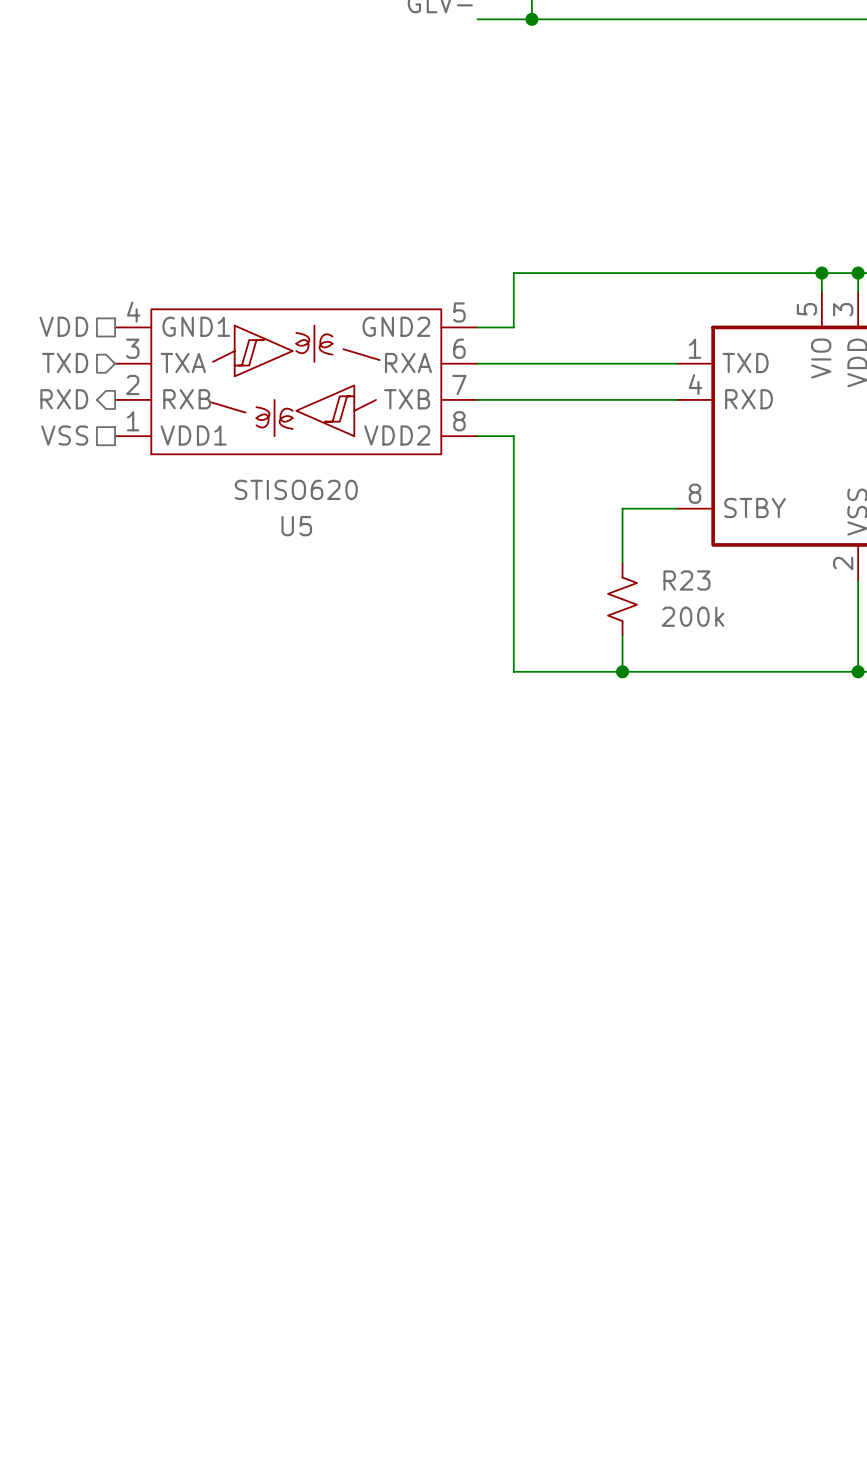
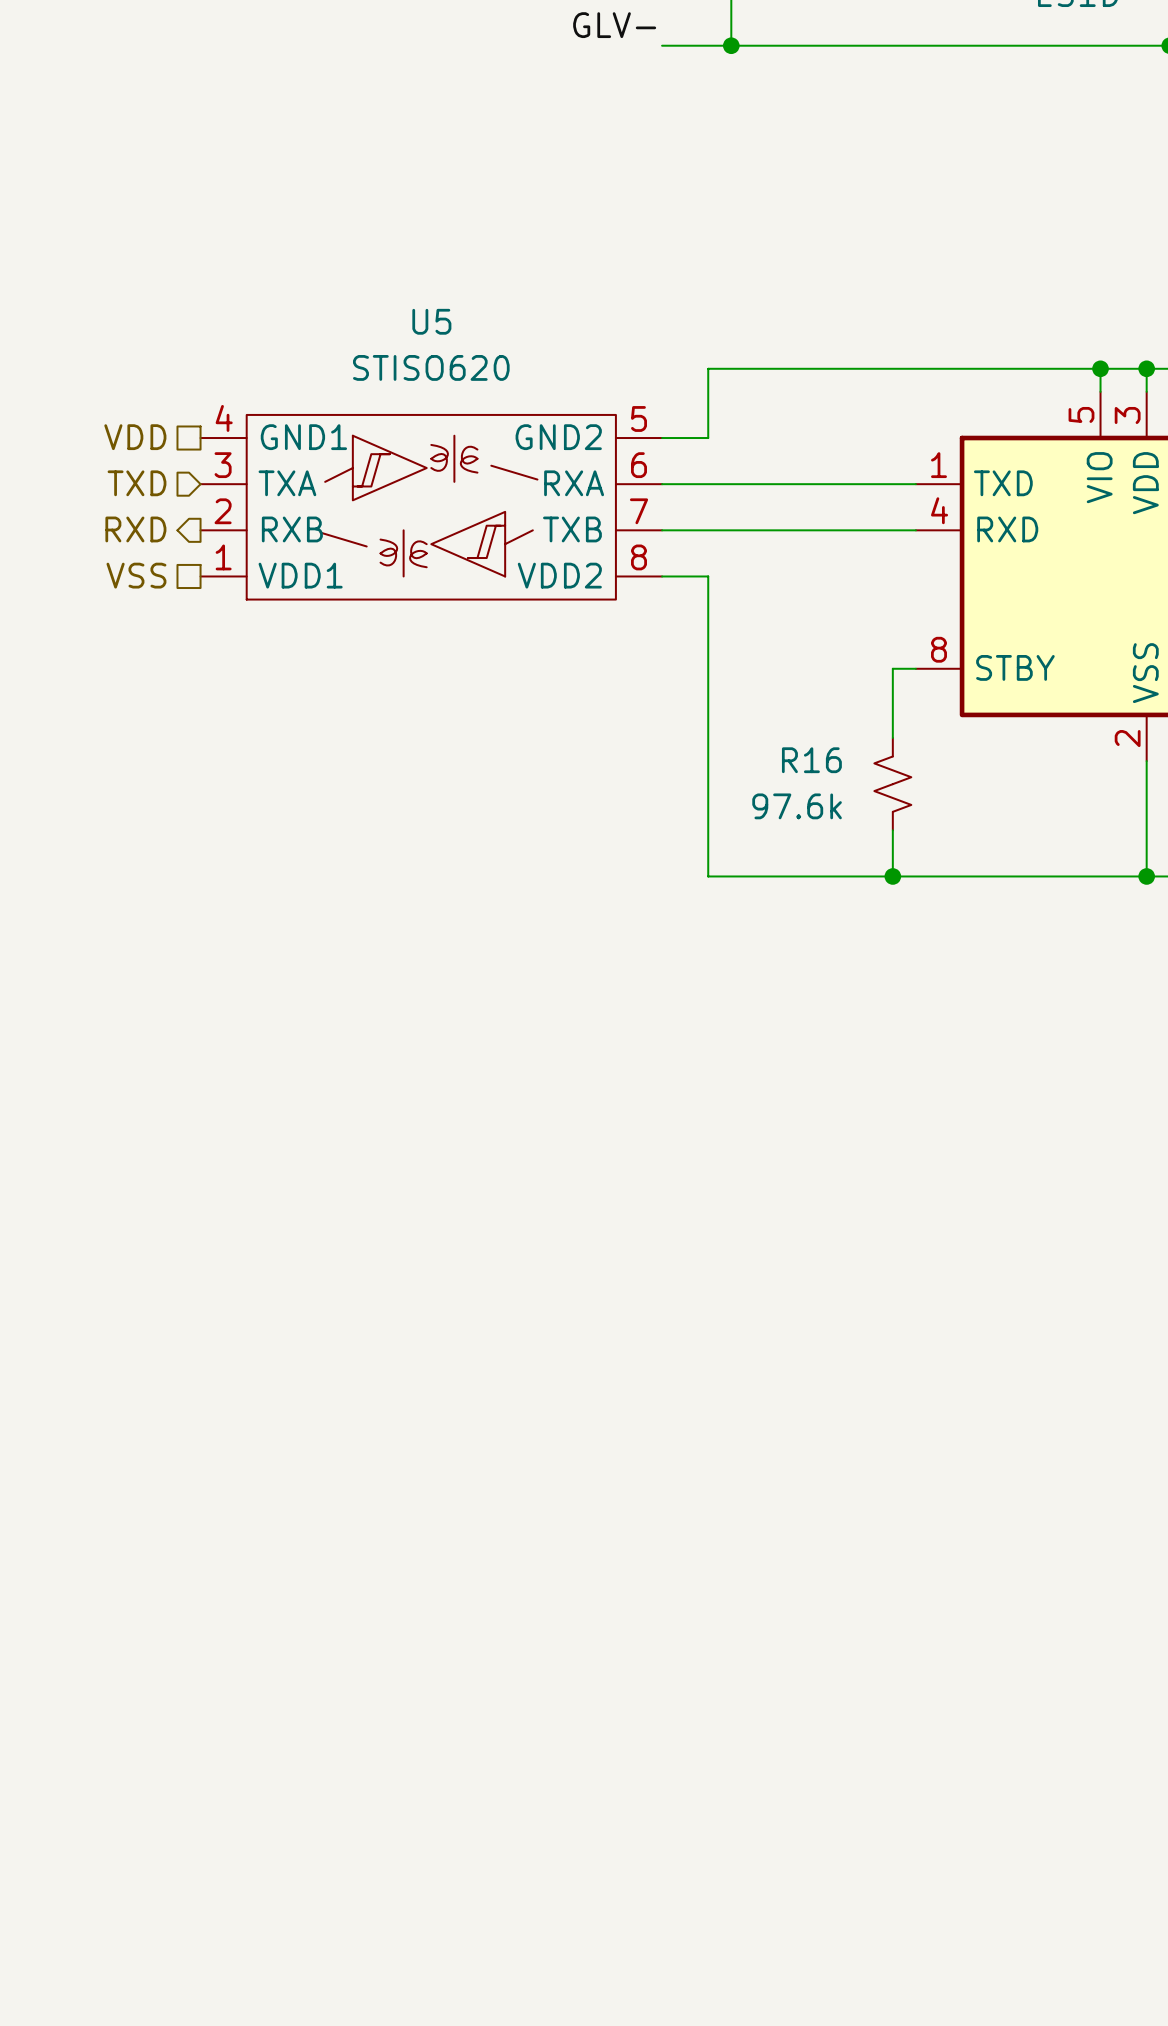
U5 value position: STISO620 (296, 489) -> STISO620 (431, 367)
wire: (658, 508) (622, 508) (622, 563) -> (892, 668) (892, 738)
U5 name position: U5 (296, 526) -> U5 (431, 321)
R23: 200k (622, 599) -> none
R16: none -> 97.6k (892, 784)
wire: (622, 635) (622, 671) -> (892, 830) (892, 876)
junction position: (622, 671) -> (892, 876)

